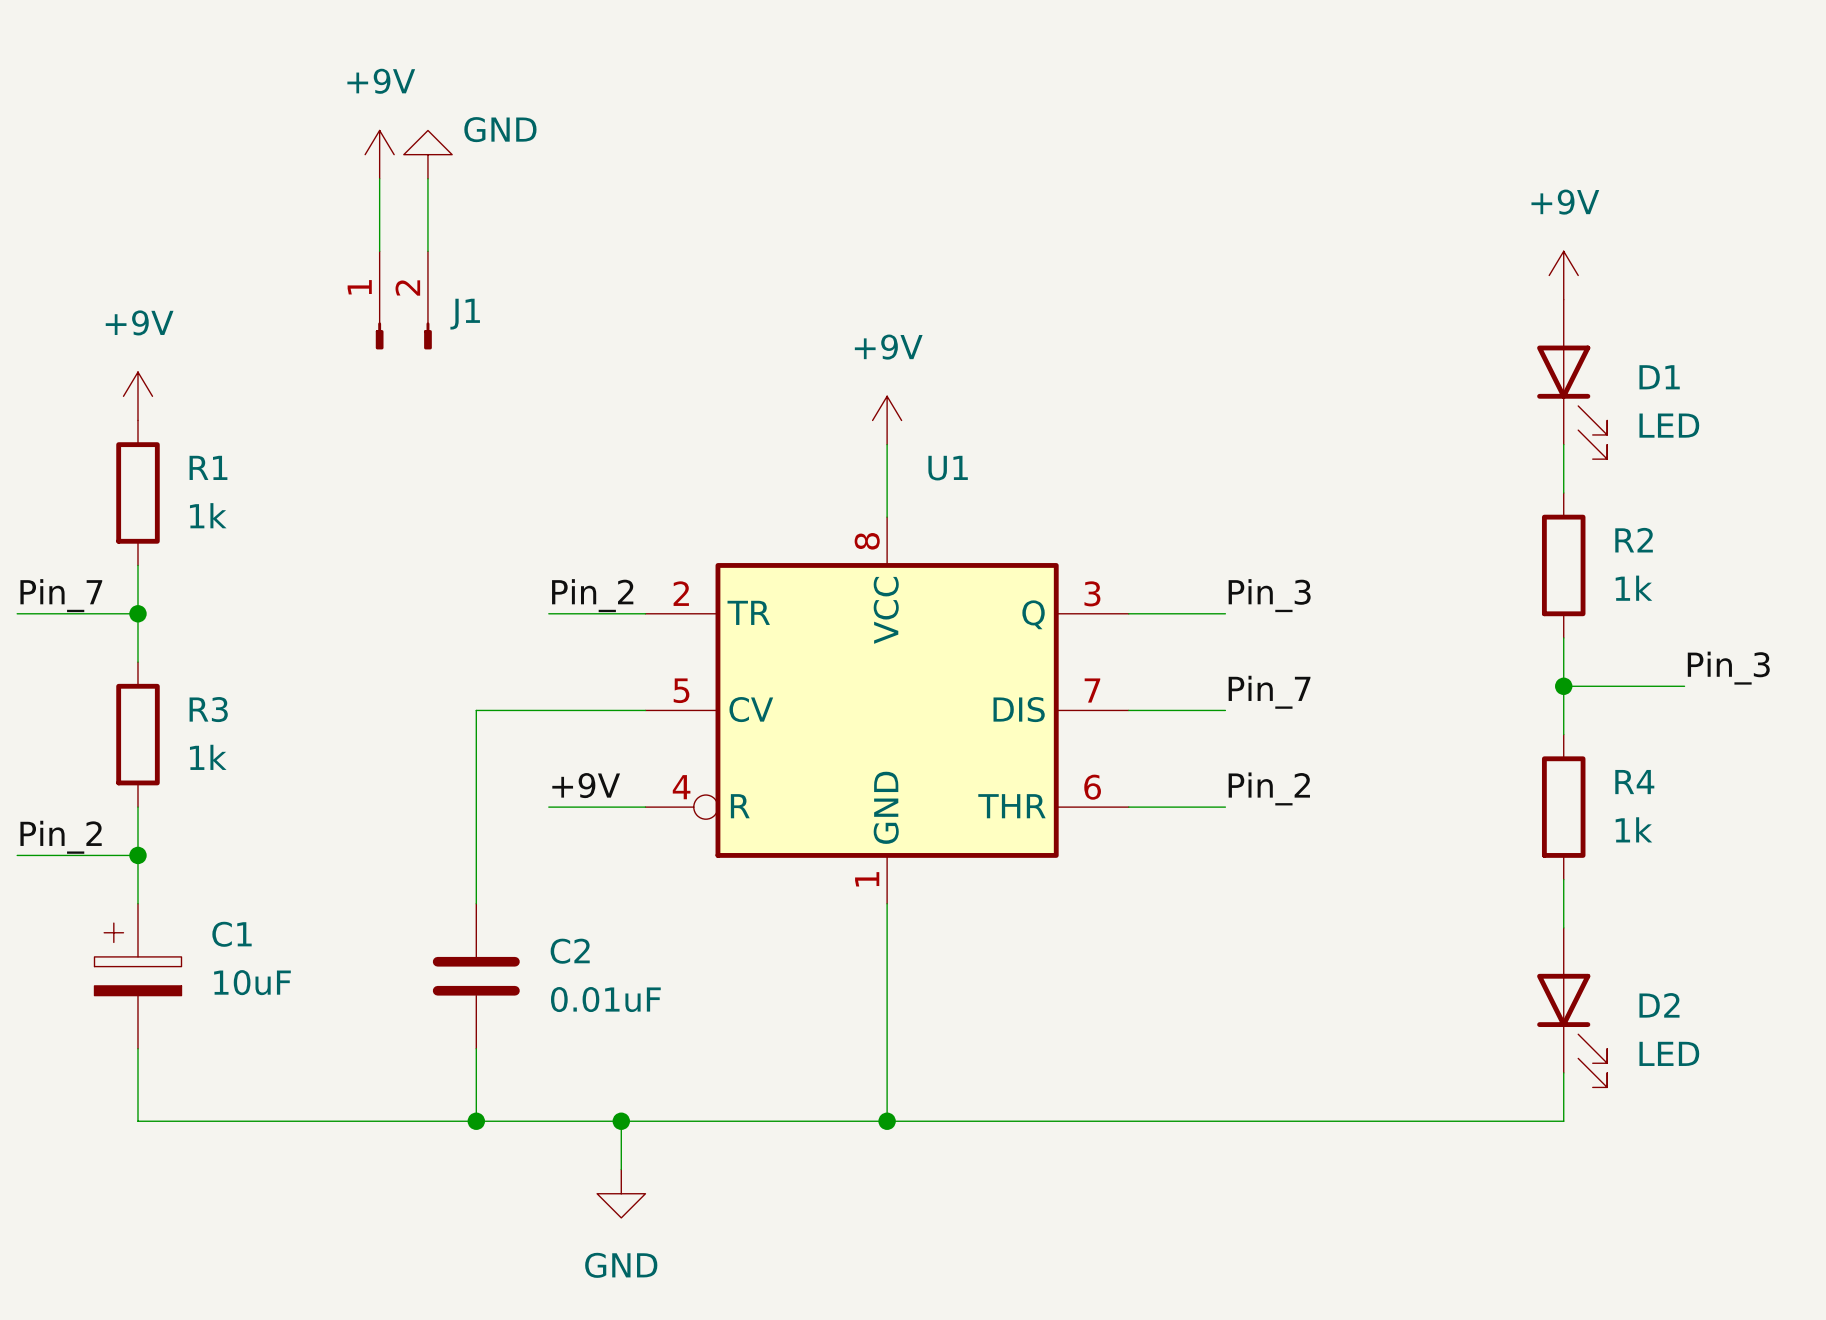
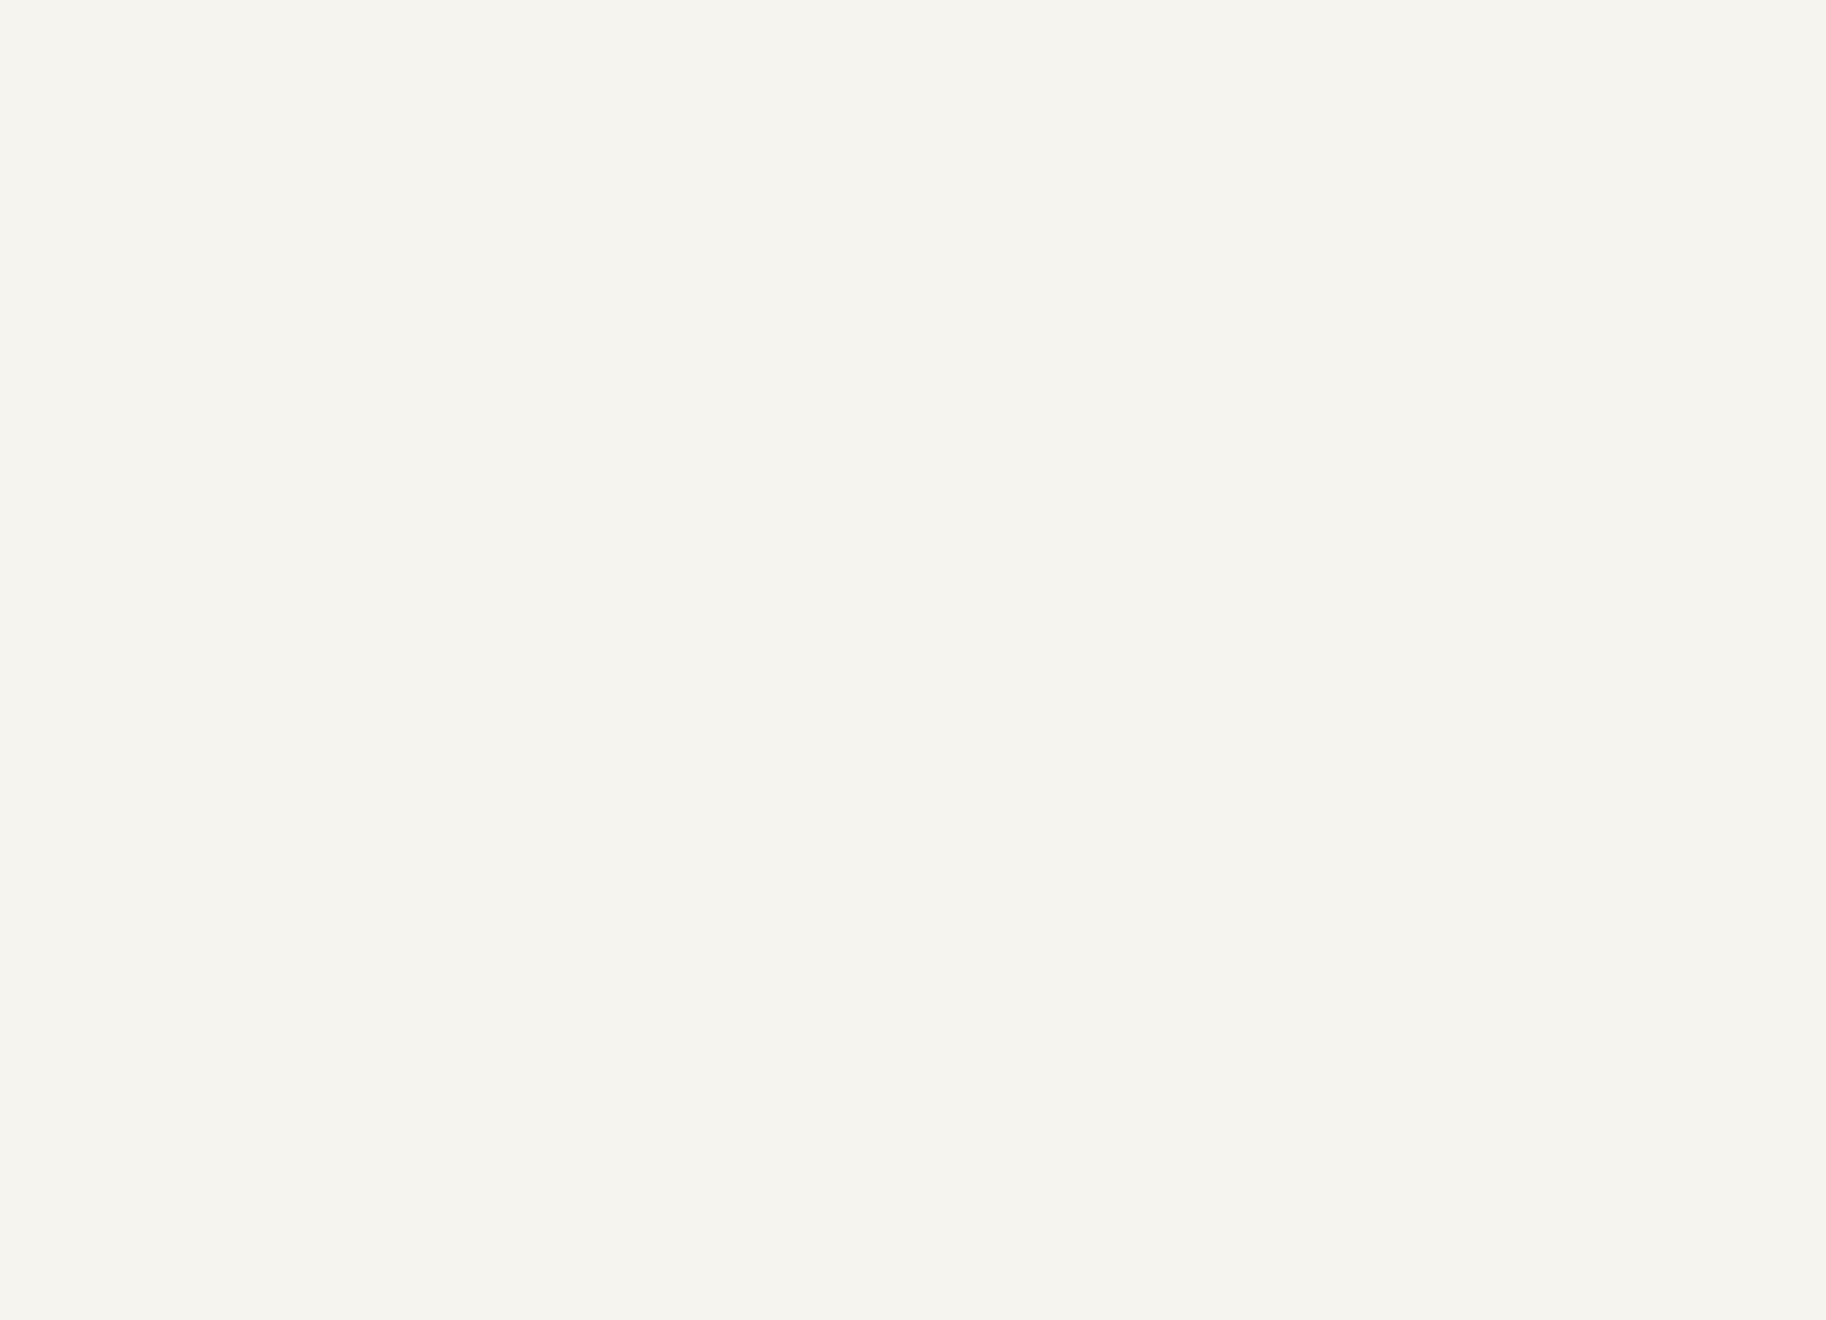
power symbol: +9V (379, 154) -> none
power symbol: GND (427, 154) -> none
wire: (379, 178) (379, 251) -> none
wire: (427, 178) (427, 251) -> none
power symbol: +9V (1563, 275) -> none
J1: (403, 300) -> none
D1: LED (1572, 379) -> none
power symbol: +9V (137, 396) -> none
power symbol: +9V (887, 420) -> none
wire: (887, 444) (887, 517) -> none
wire: (1563, 444) (1563, 492) -> none
R1: 1k (137, 492) -> none
wire: (137, 565) (137, 662) -> none
R2: 1k (1563, 565) -> none
label: Pin_7 (61, 595) -> none
label: Pin_2 (592, 595) -> none
label: Pin_3 (1269, 595) -> none
wire: (17, 613) (137, 613) -> none
junction: (137, 613) -> none
wire: (548, 613) (645, 613) -> none
wire: (1128, 613) (1225, 613) -> none
wire: (1563, 637) (1563, 734) -> none
label: Pin_3 (1728, 668) -> none
wire: (1563, 686) (1684, 686) -> none
junction: (1563, 686) -> none
label: Pin_7 (1269, 692) -> none
wire: (645, 710) (476, 710) (476, 903) -> none
U1: (887, 710) -> none
wire: (1128, 710) (1225, 710) -> none
R3: 1k (137, 734) -> none
label: +9V (586, 785) -> none
label: Pin_2 (1269, 788) -> none
wire: (137, 807) (137, 903) -> none
wire: (548, 807) (645, 807) -> none
wire: (1128, 807) (1225, 807) -> none
R4: 1k (1563, 807) -> none
label: Pin_2 (61, 837) -> none
wire: (17, 855) (137, 855) -> none
junction: (137, 855) -> none
wire: (1563, 879) (1563, 927) -> none
wire: (887, 903) (887, 1121) -> none
C1: 10uF (137, 976) -> none
C2: 0.01uF (476, 976) -> none
D2: LED (1572, 1007) -> none
wire: (137, 1048) (137, 1121) (1563, 1121) (1563, 1072) -> none
wire: (476, 1048) (476, 1121) -> none
junction: (476, 1121) -> none
wire: (621, 1121) (621, 1169) -> none
junction: (621, 1121) -> none
junction: (887, 1121) -> none
power symbol: GND (621, 1193) -> none

